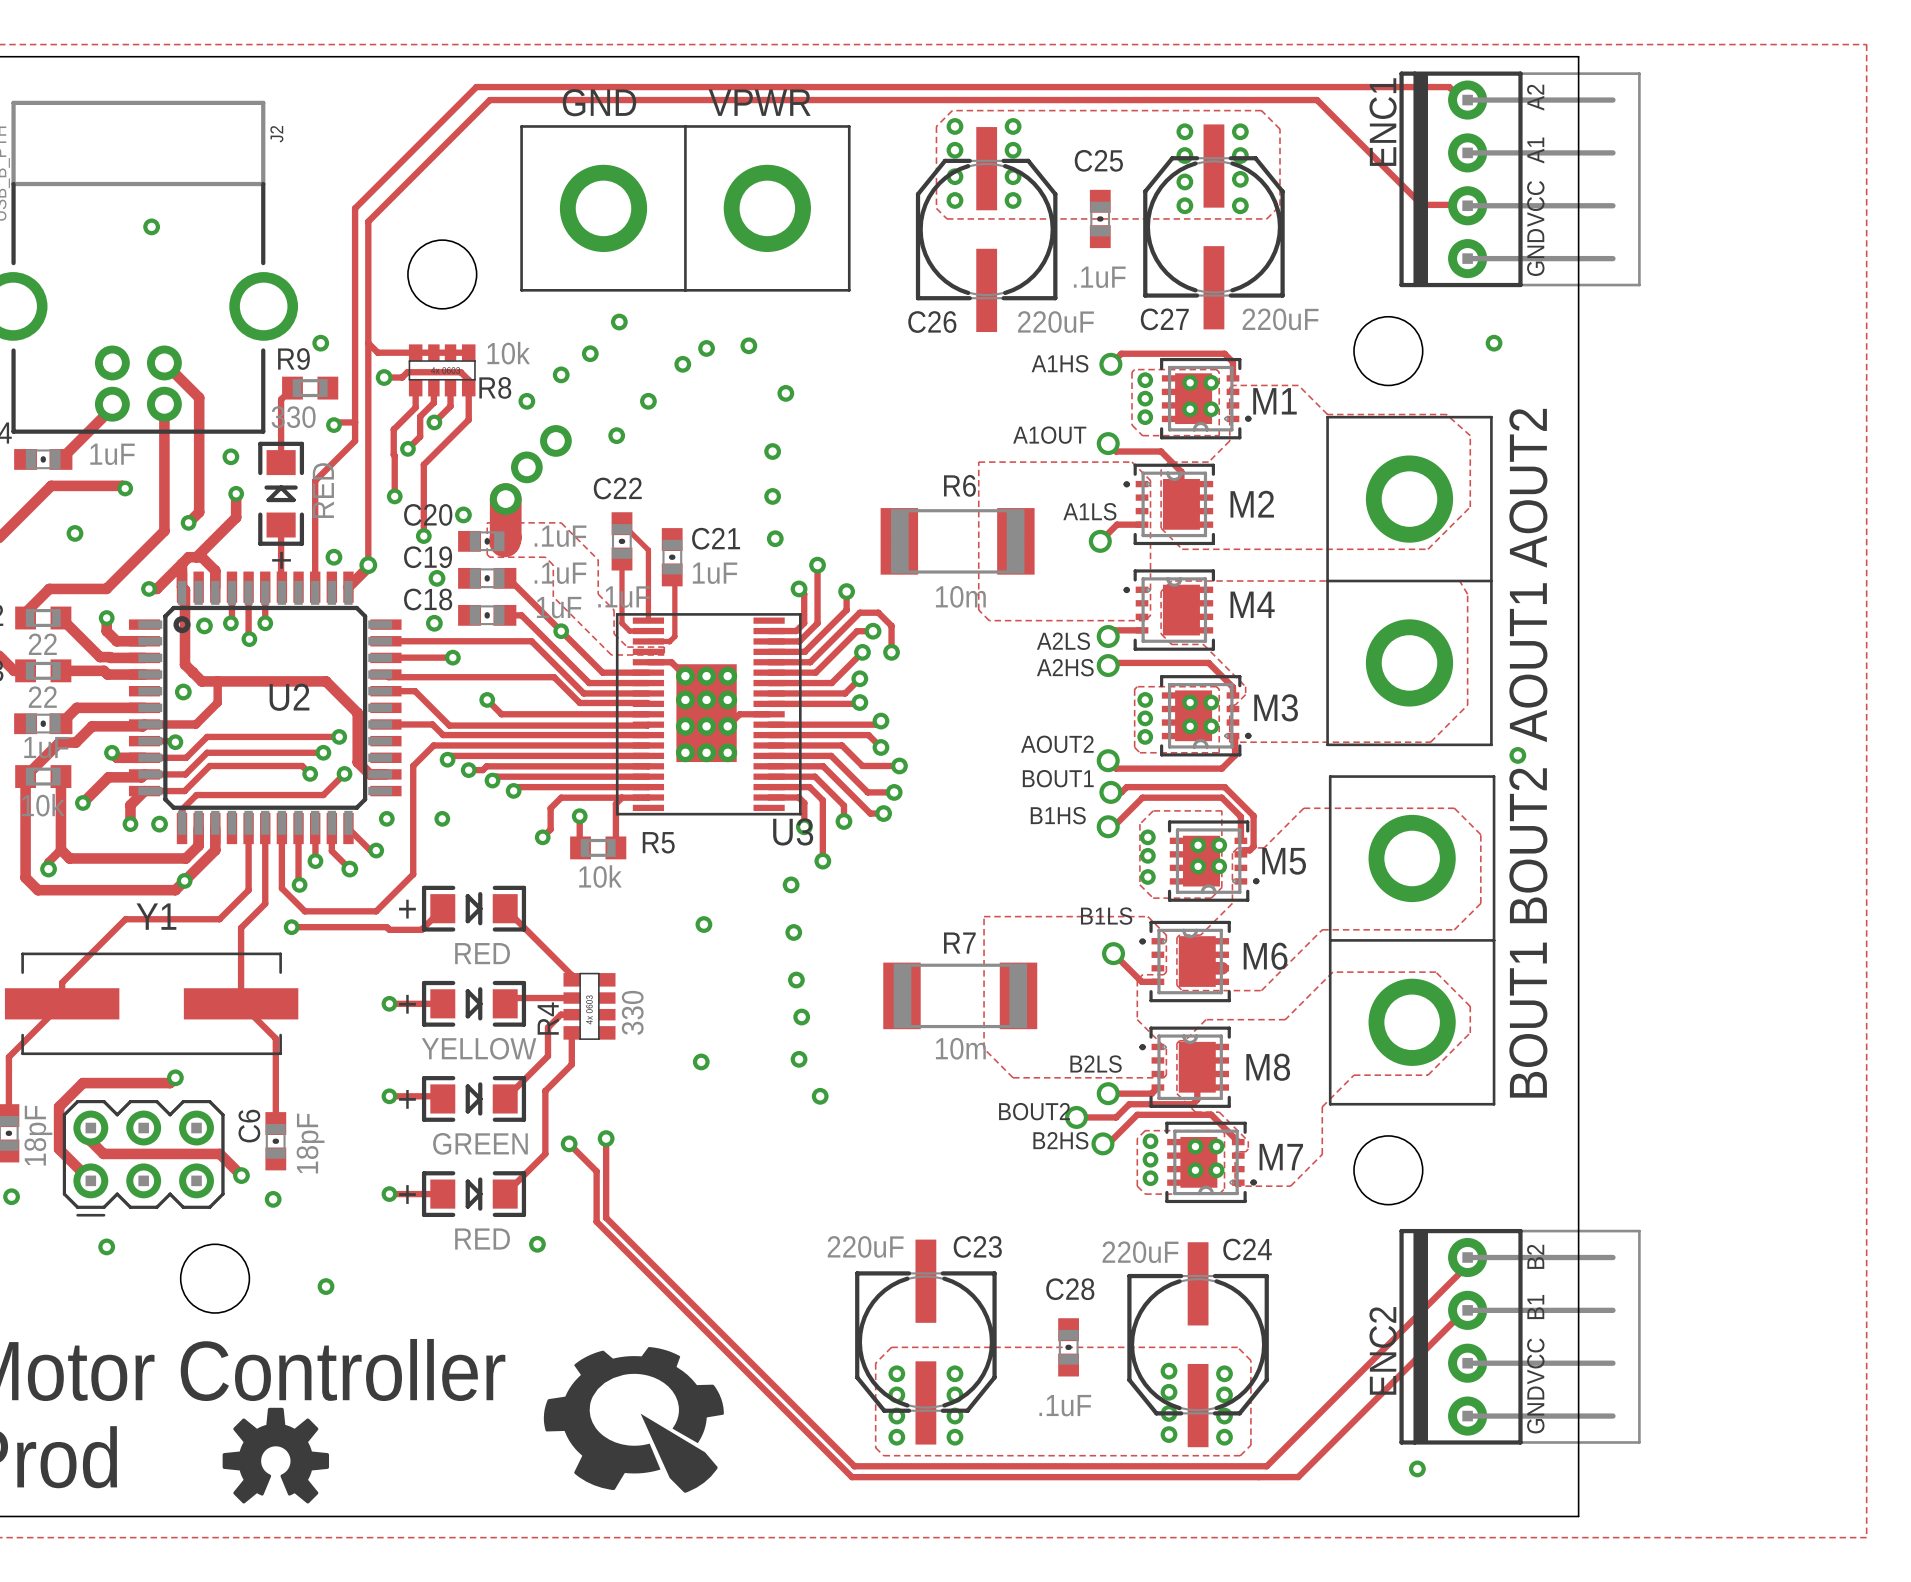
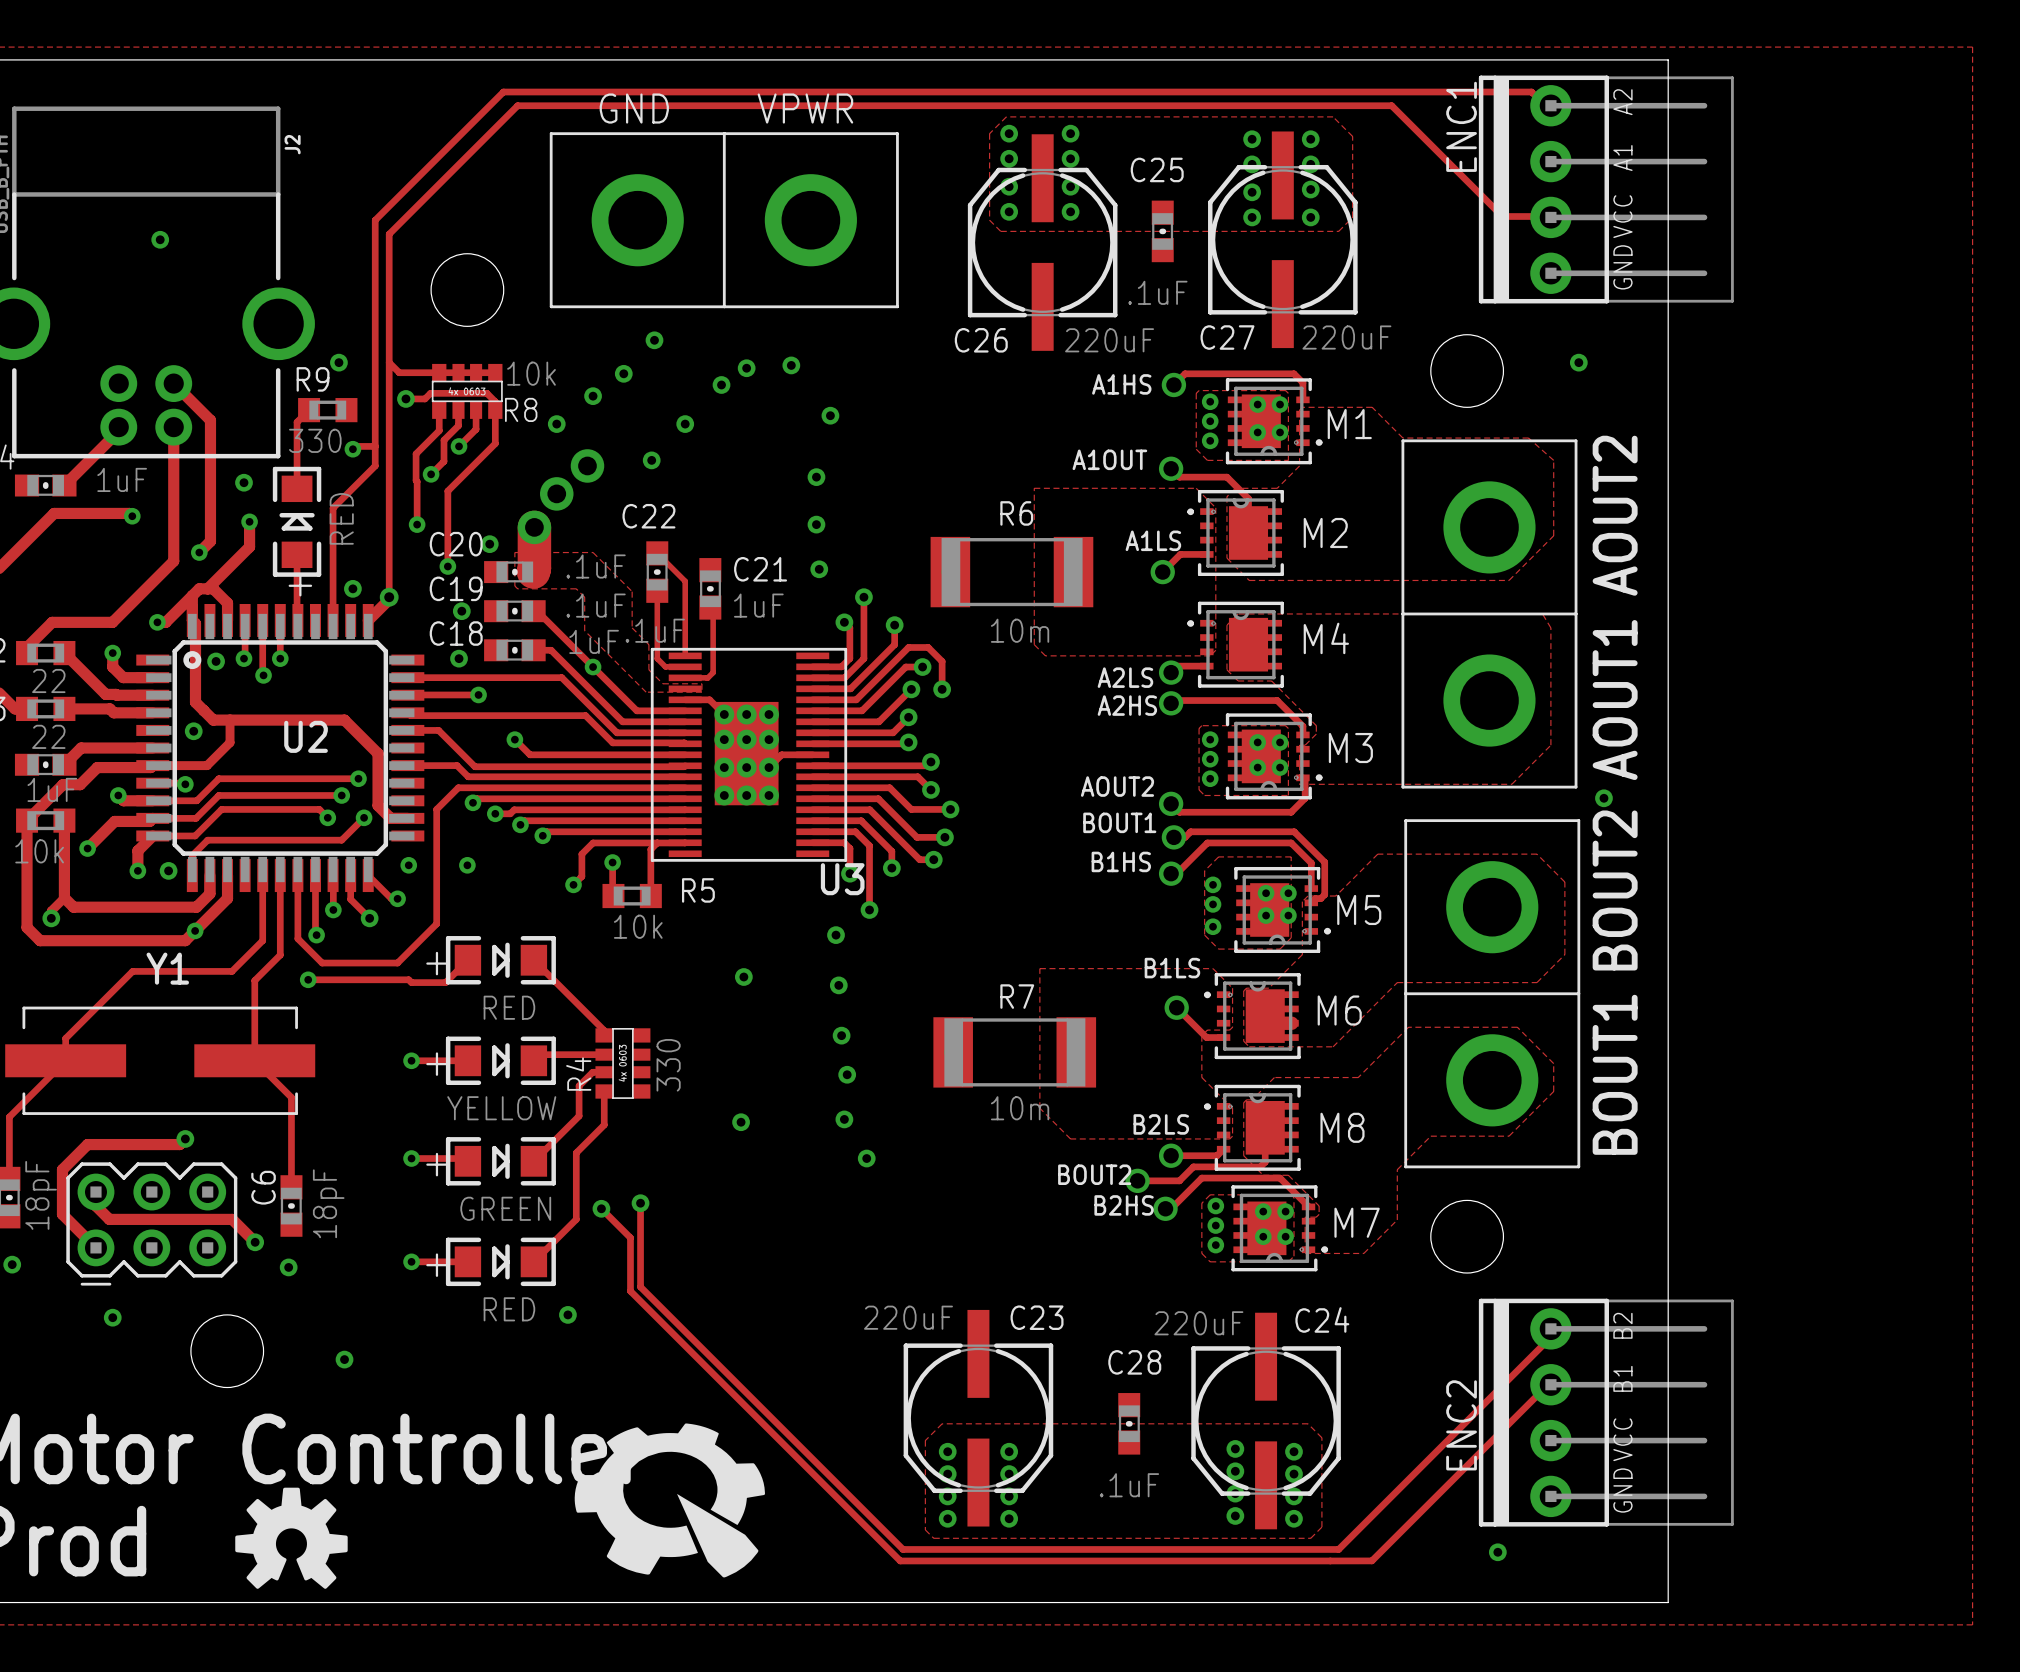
via: (74, 533) -> none

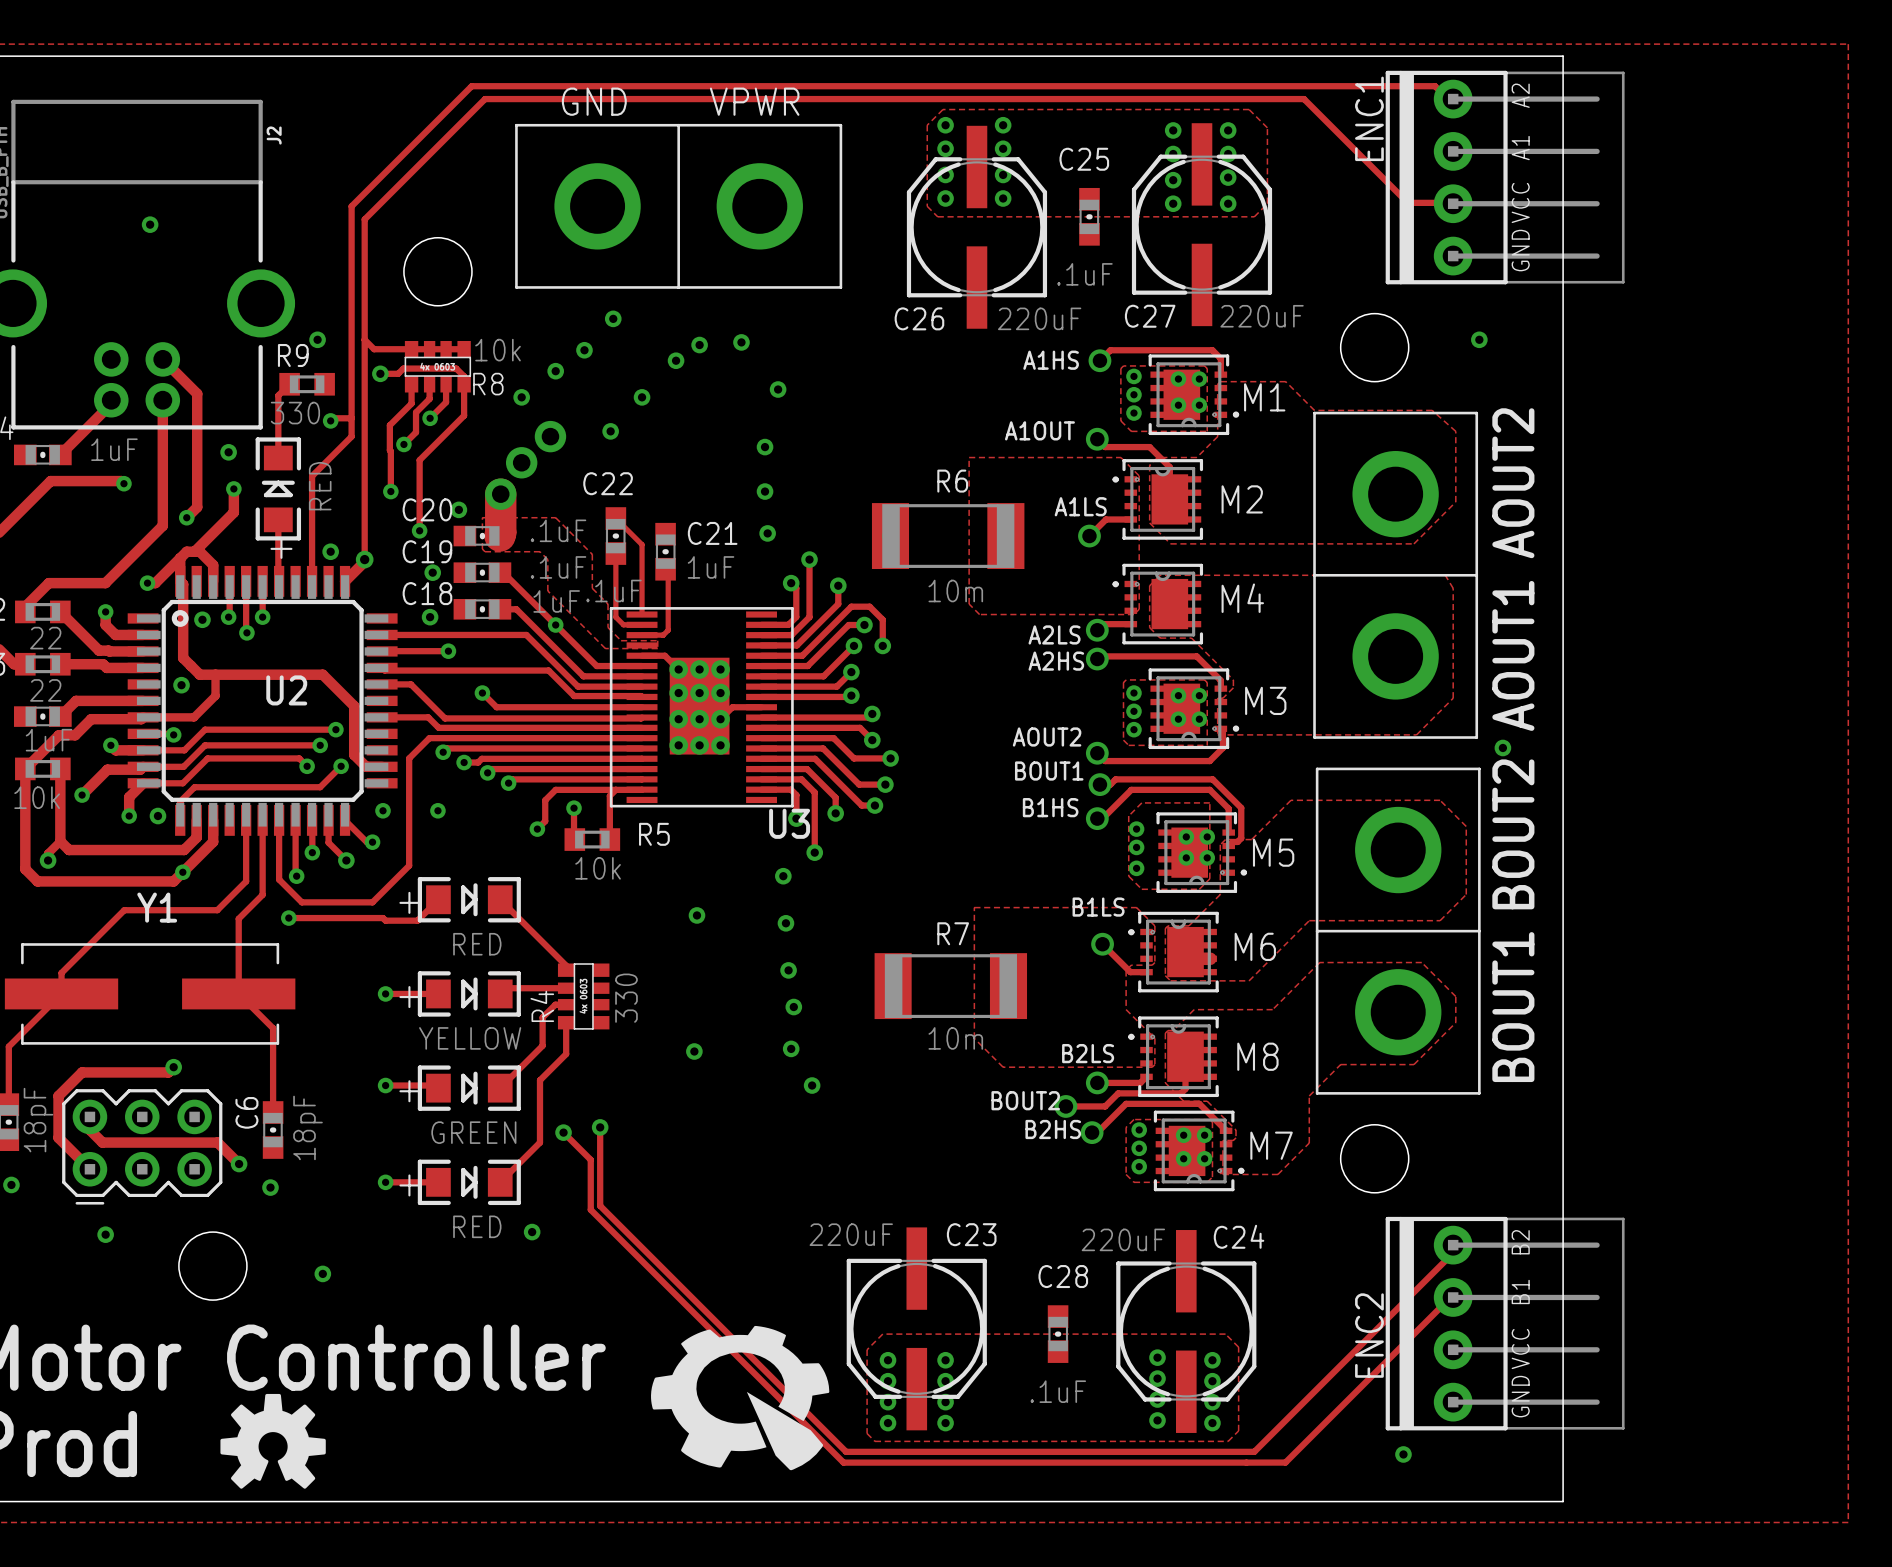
drawing position: (669, 1500) -> (740, 1398)

